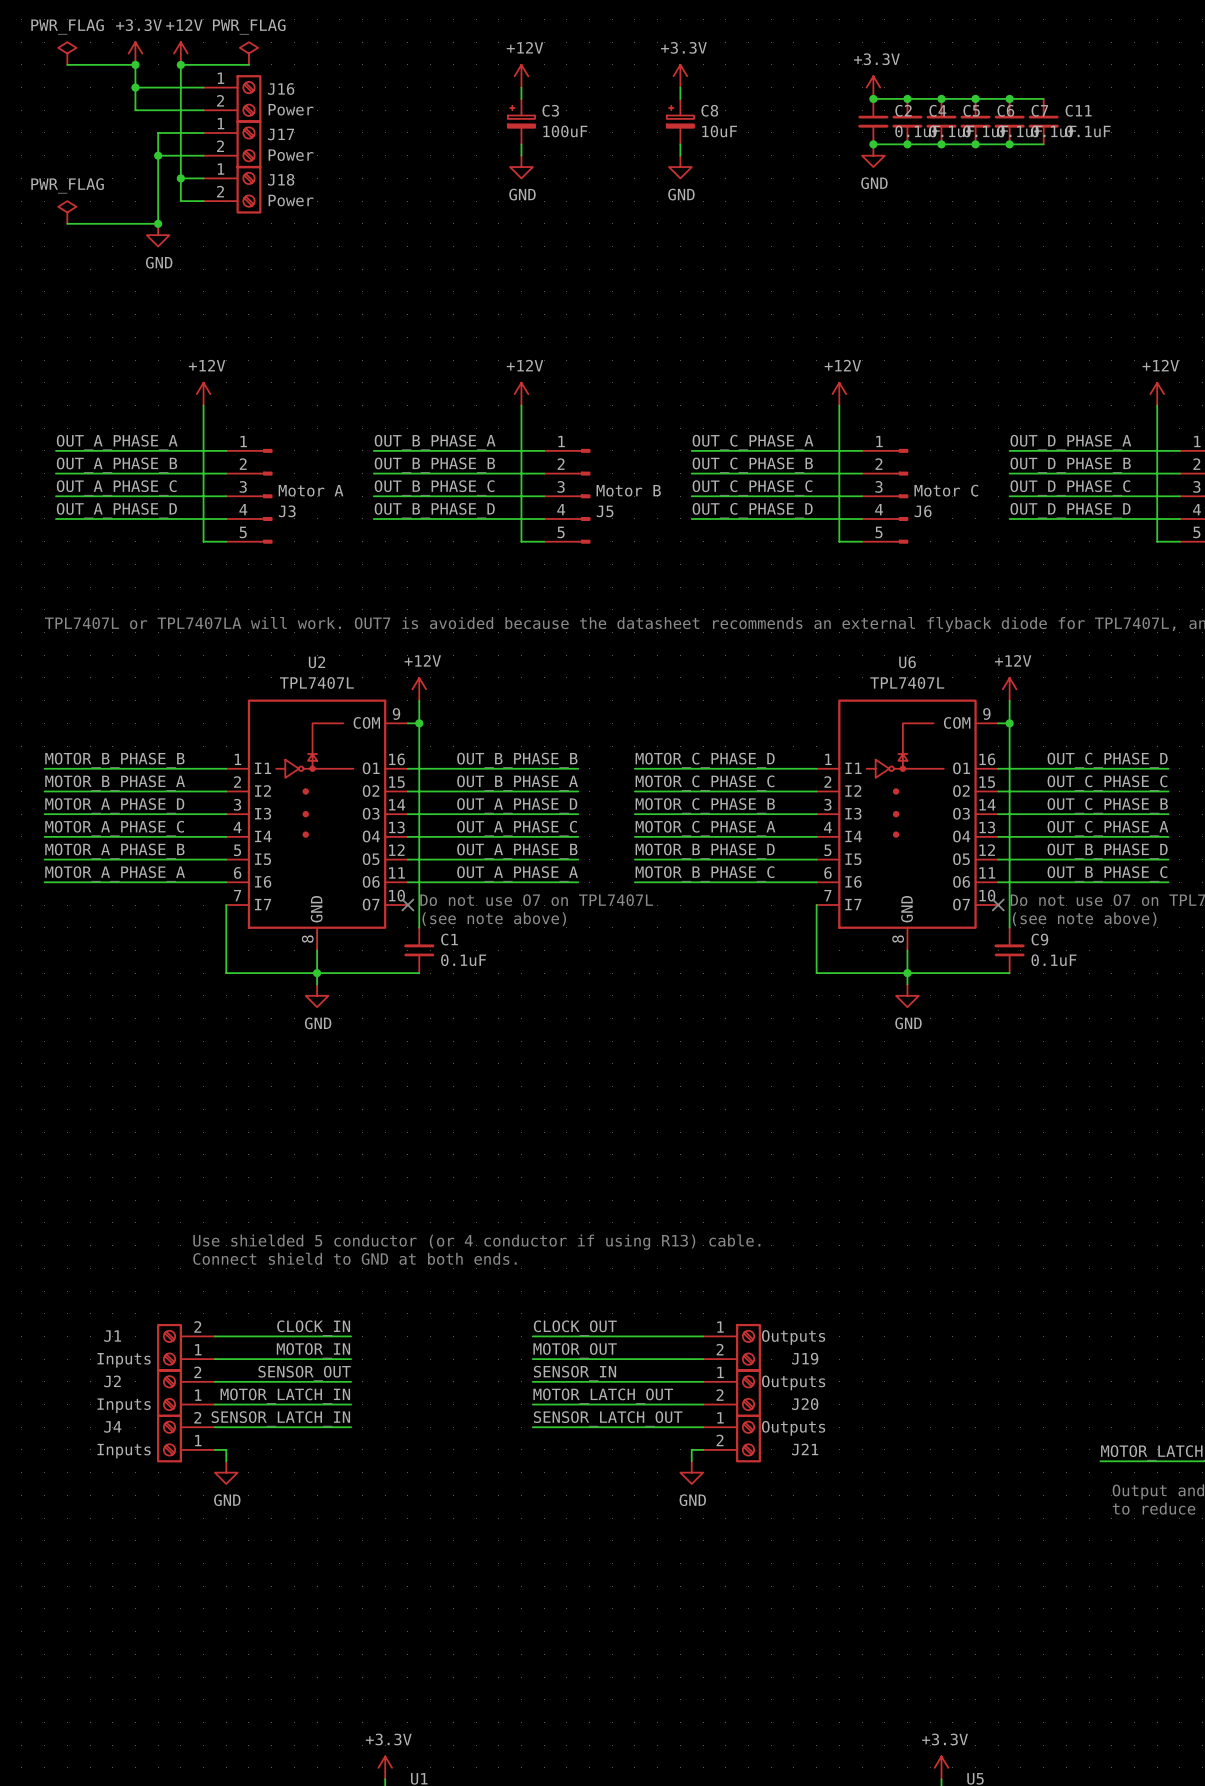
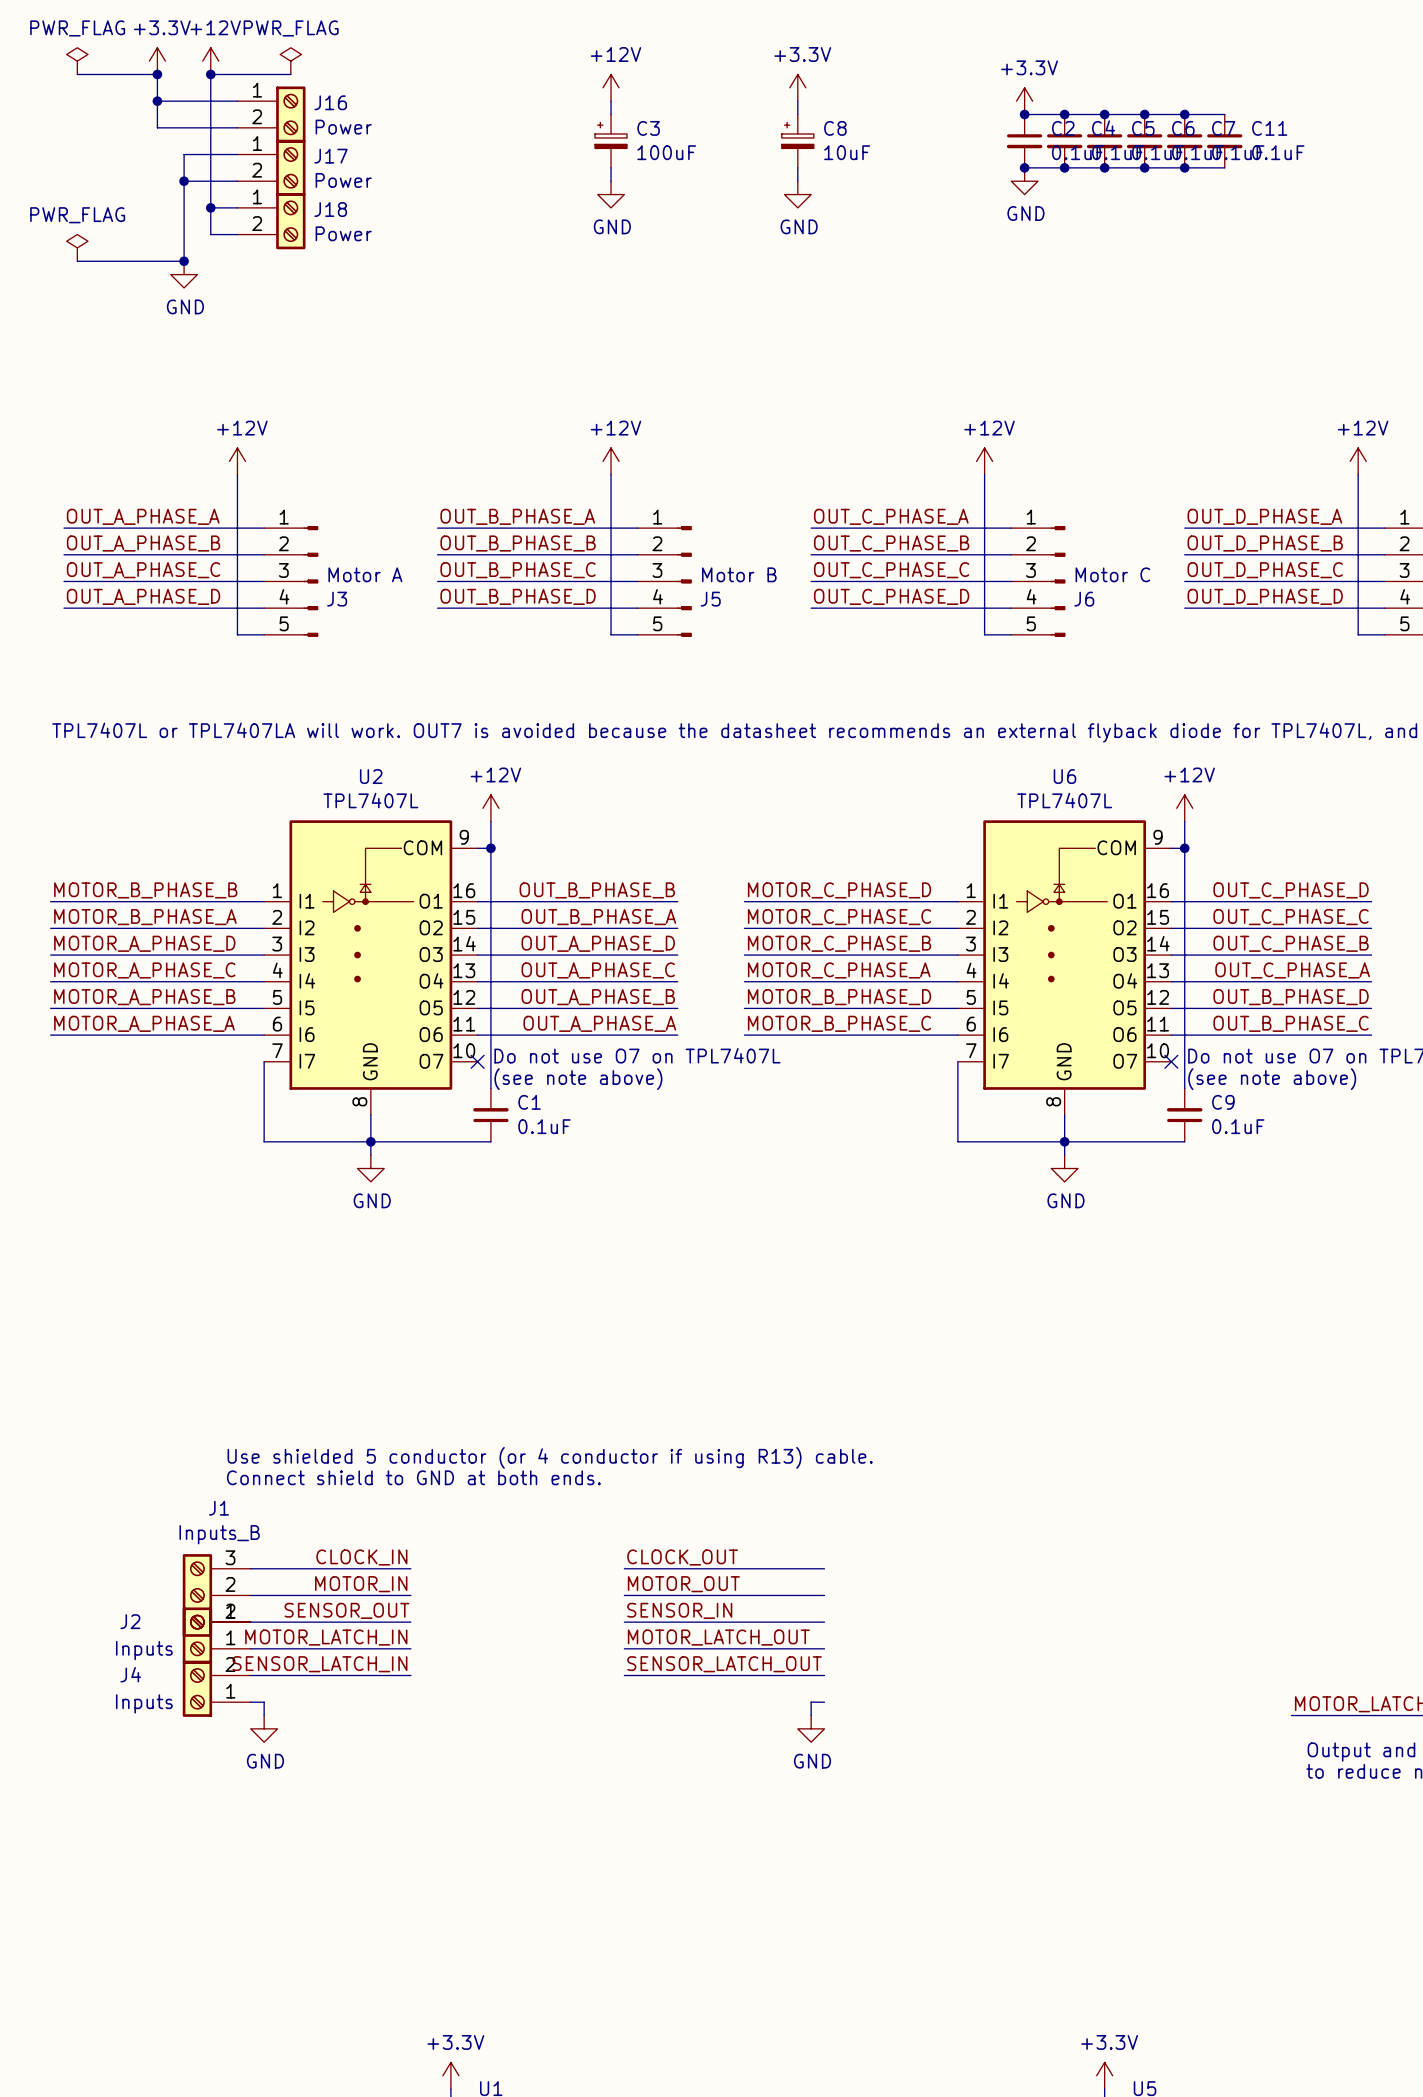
J1 symbol: [157, 1323, 215, 1372] -> [182, 1554, 251, 1637]
J1 name position: J1 (112, 1336) -> J1 (218, 1508)
J19: Outputs (732, 1347) -> none
J1 value: Inputs (124, 1360) -> Inputs_B (219, 1534)
J20: Outputs (732, 1393) -> none
J21: Outputs (732, 1438) -> none

